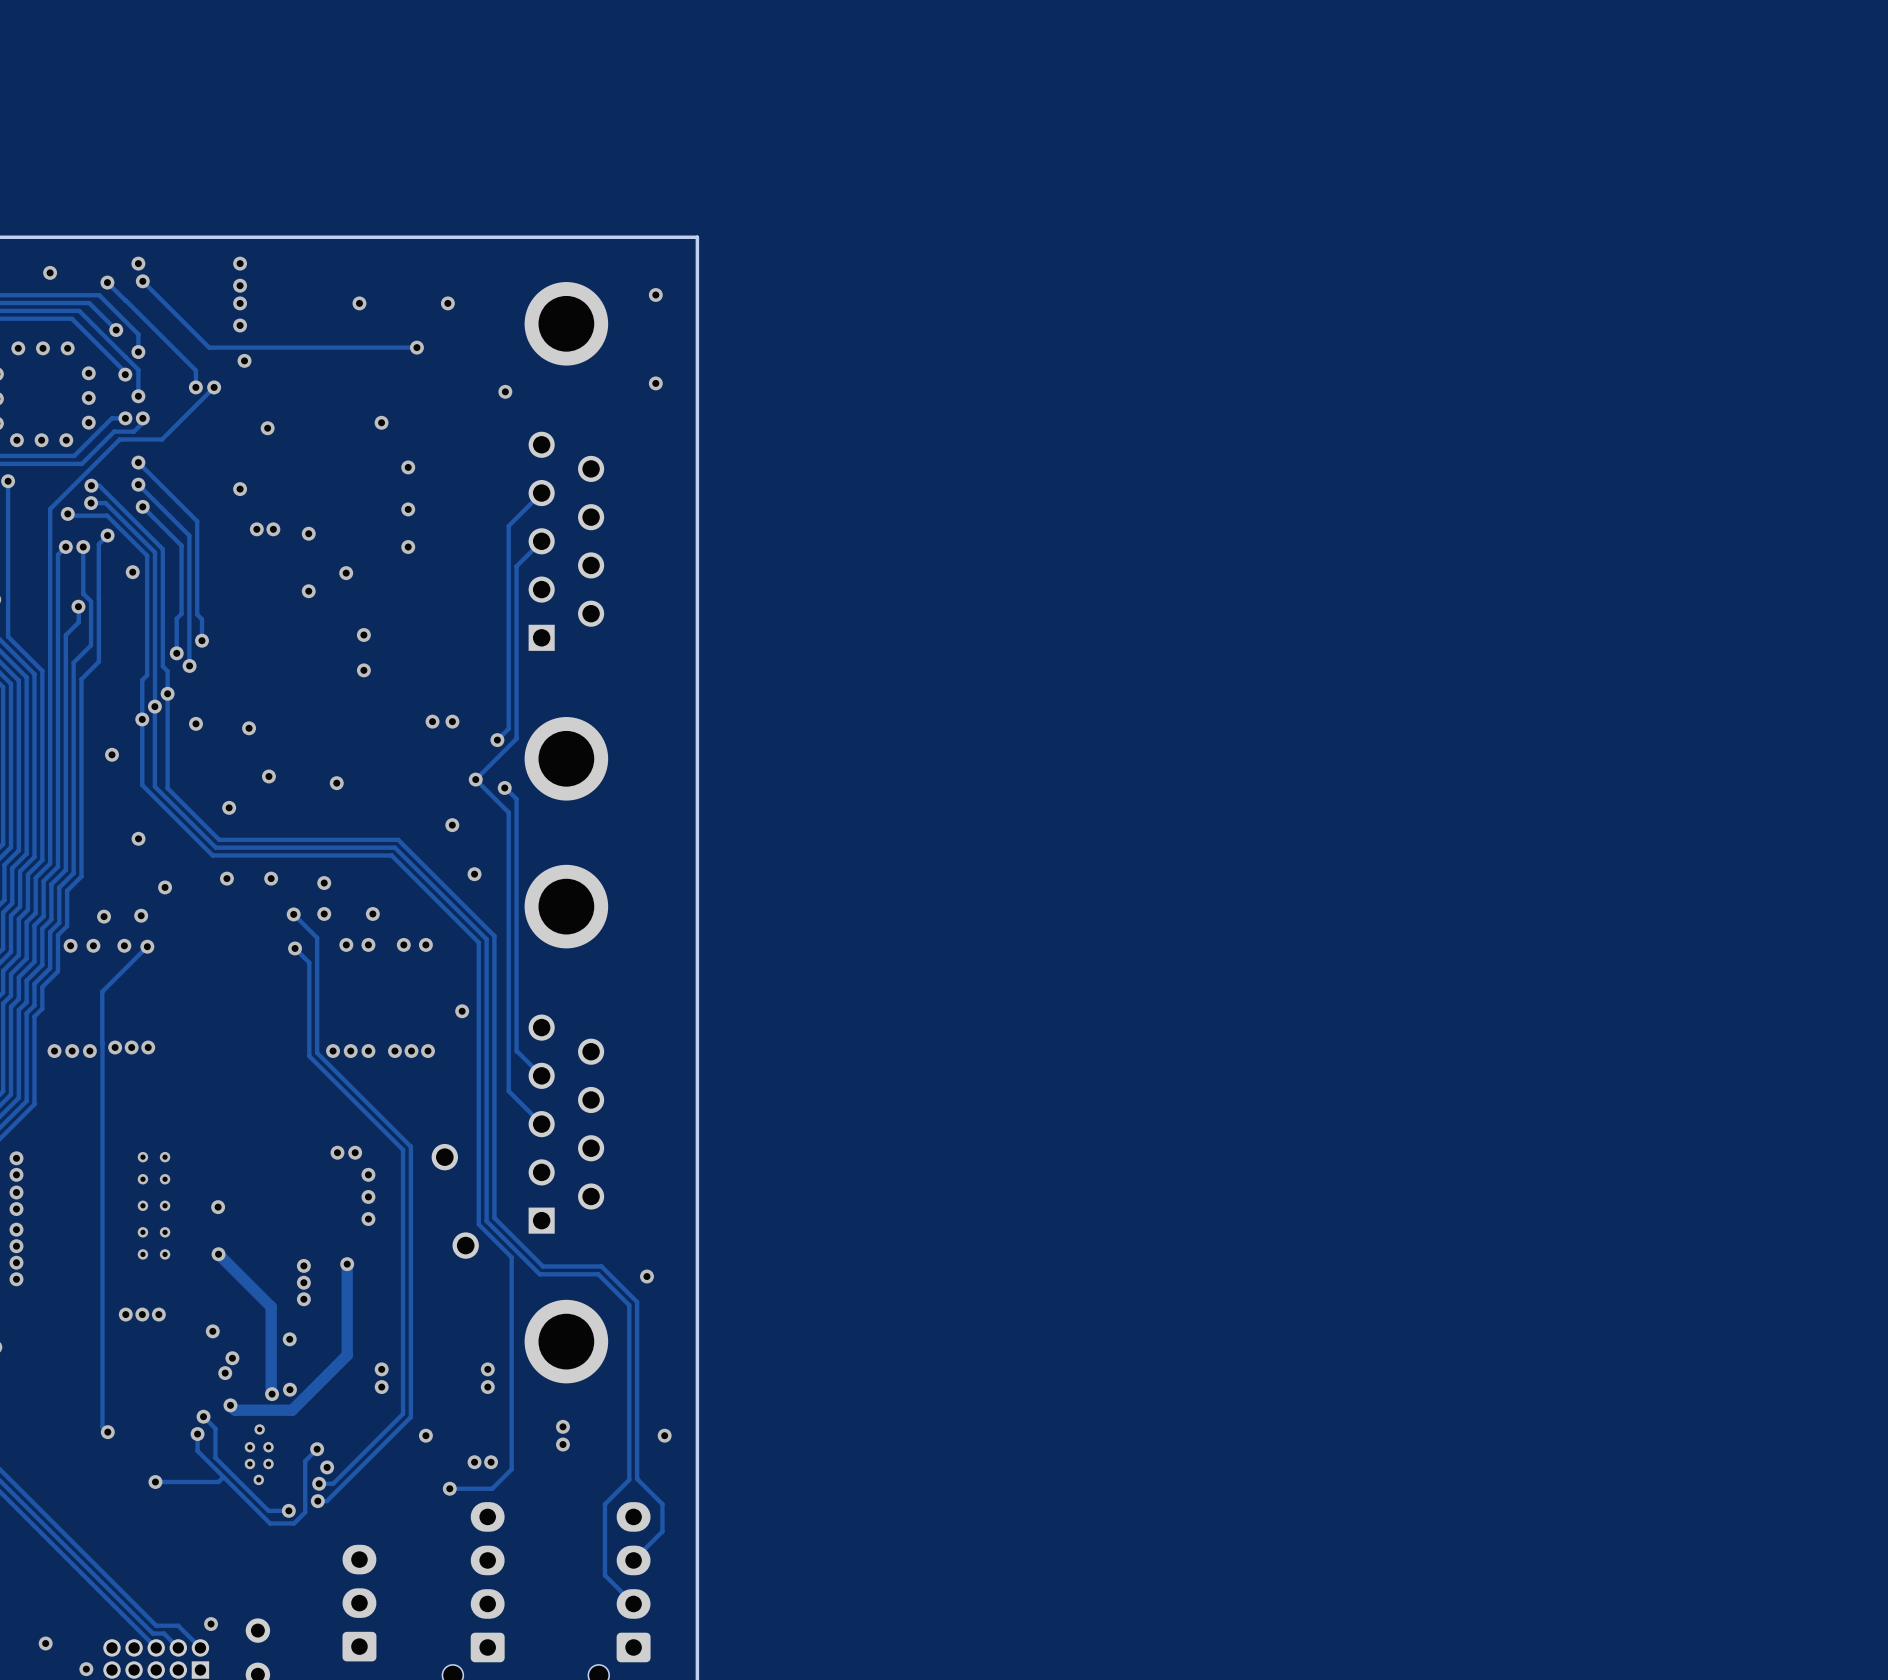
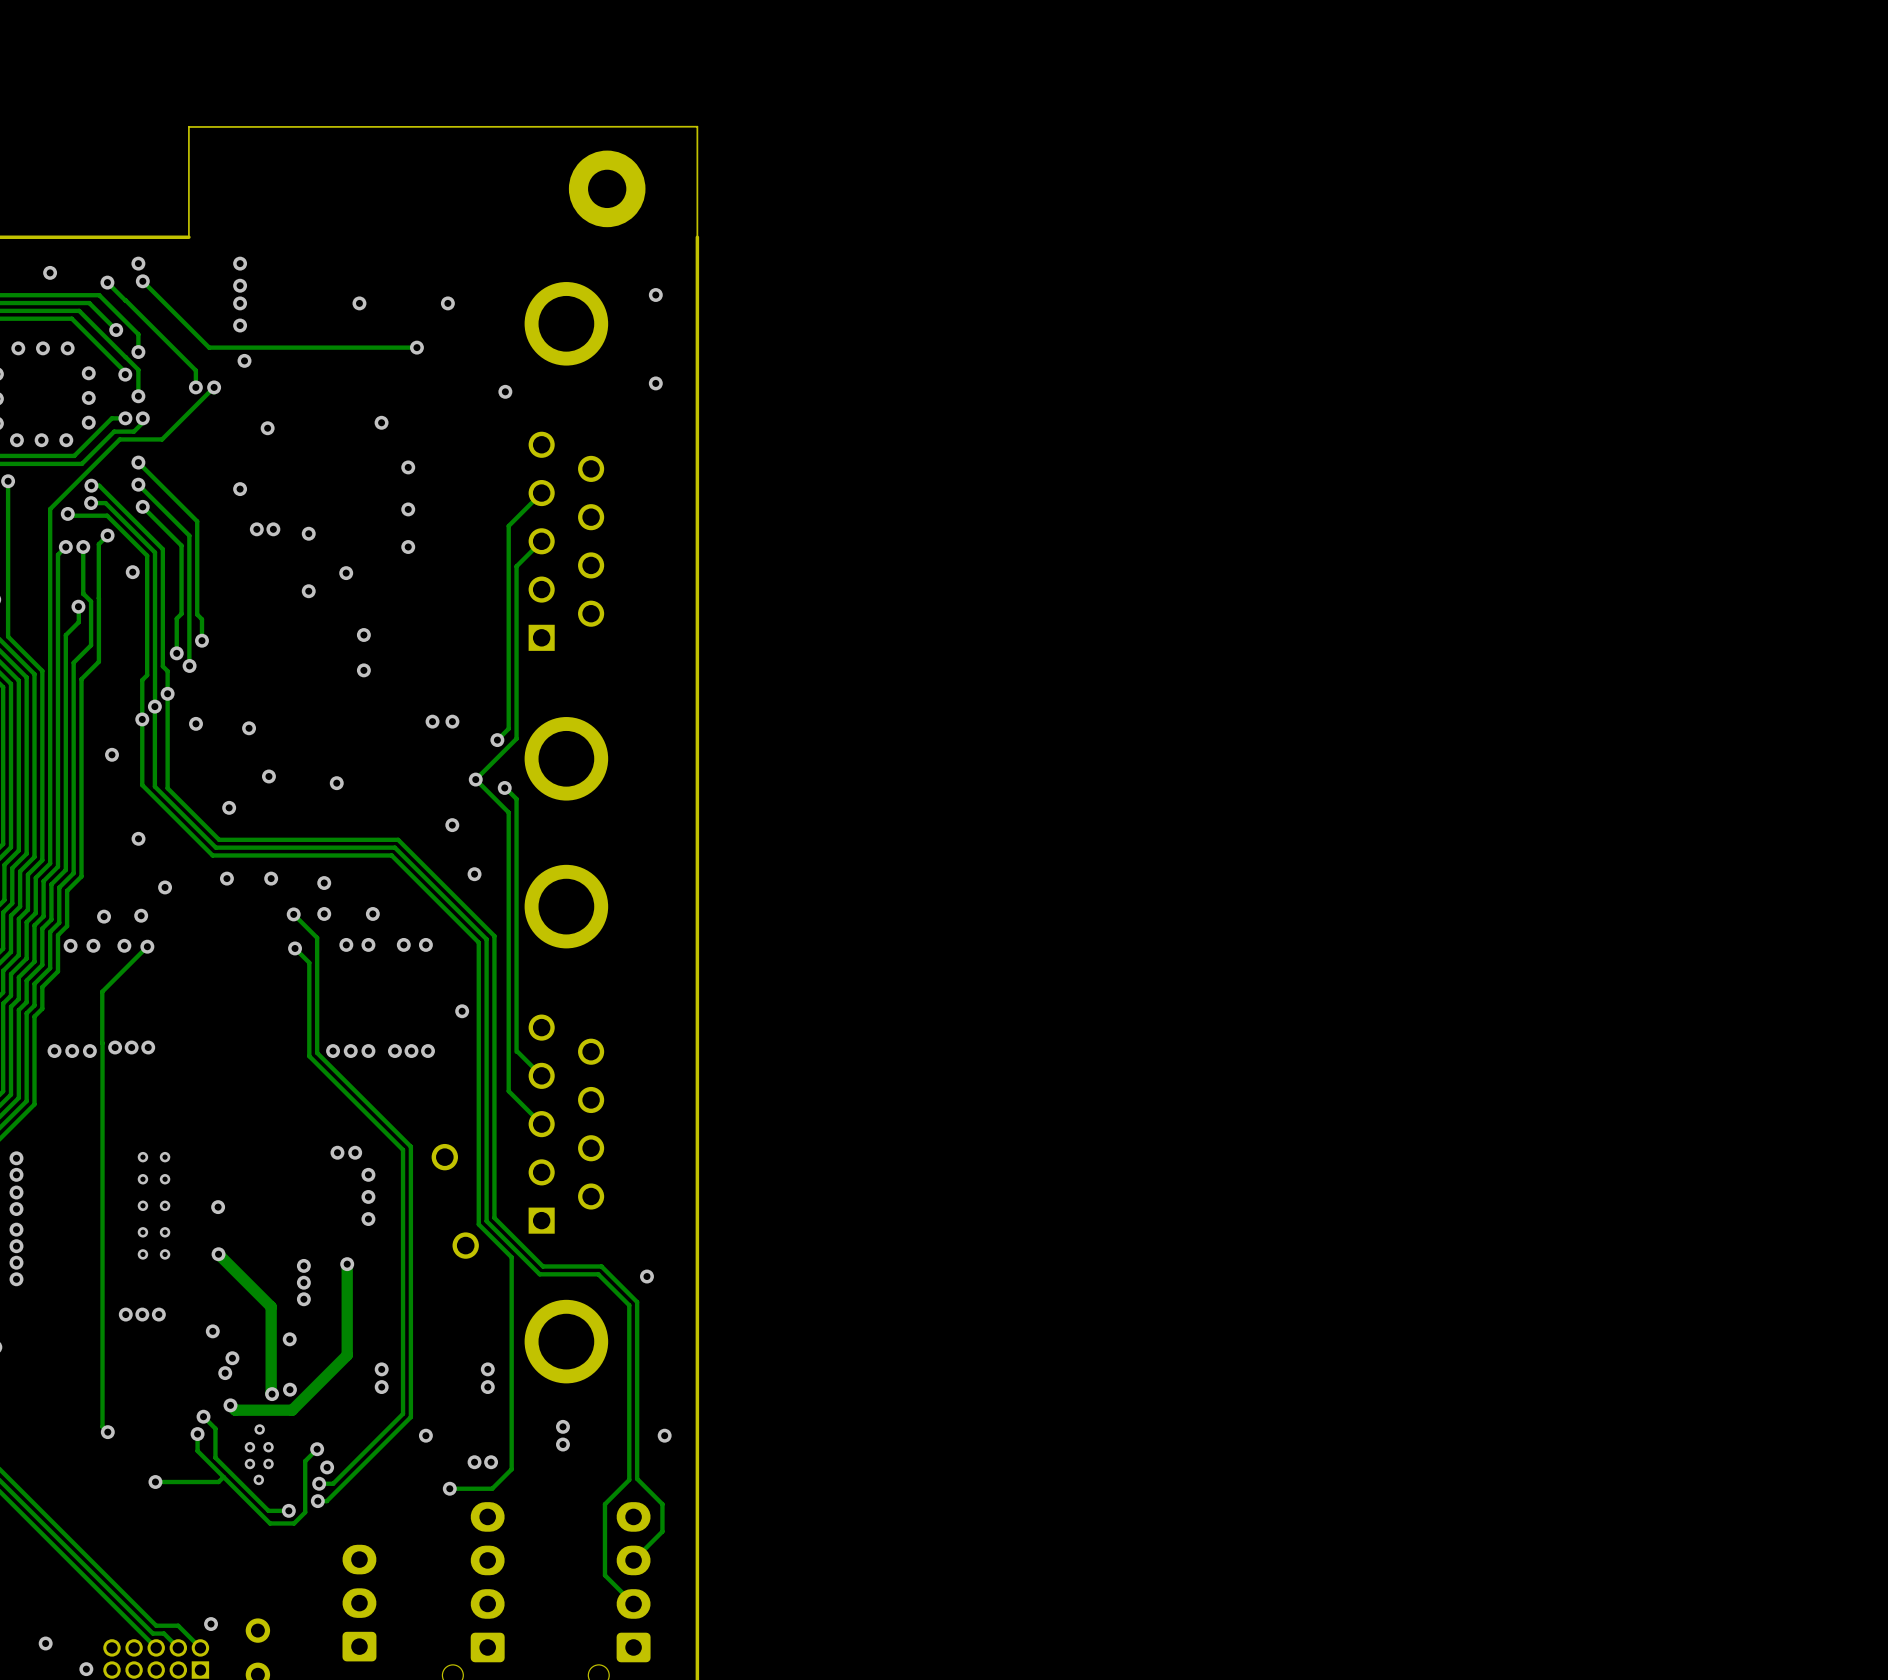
part: none -> (607, 188)
board edge: (697, 237) (188, 237) -> (697, 237) (697, 126) (188, 126) (188, 237)

